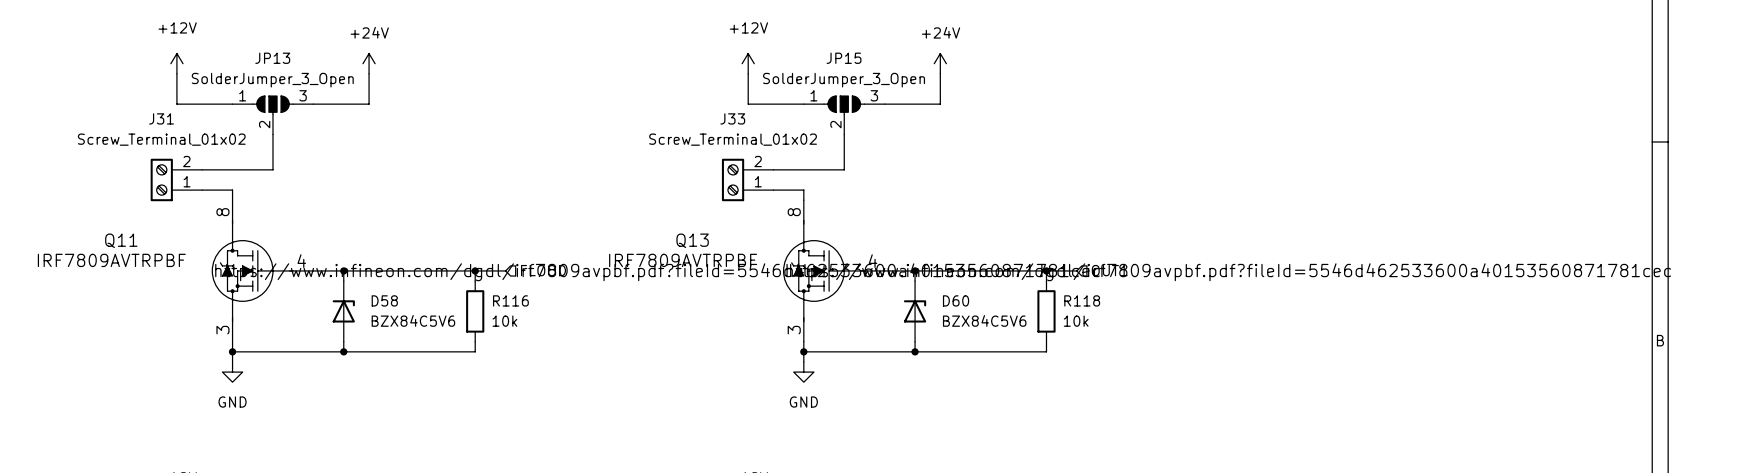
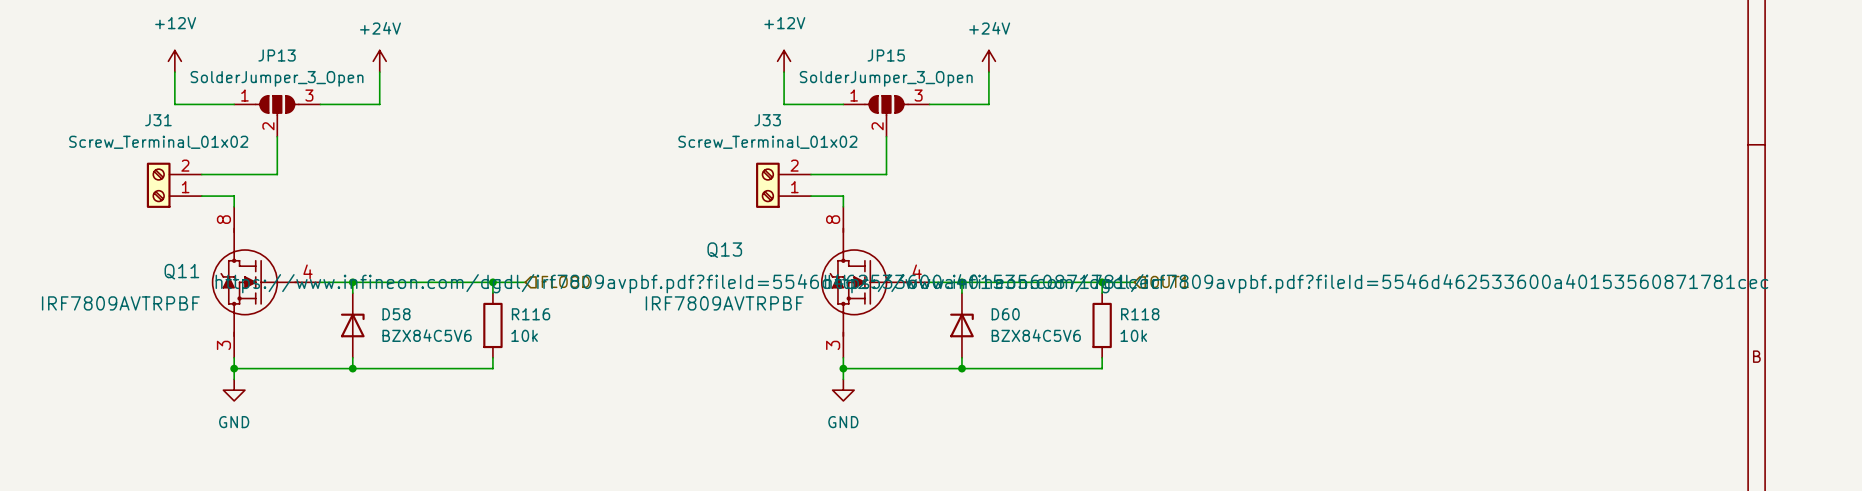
Q11 name position: Q11 (121, 240) -> Q11 (181, 271)
Q11 value position: IRF7809AVTRPBF (111, 260) -> IRF7809AVTRPBF (120, 303)
Q13 value position: IRF7809AVTRPBF (683, 260) -> IRF7809AVTRPBF (724, 303)

